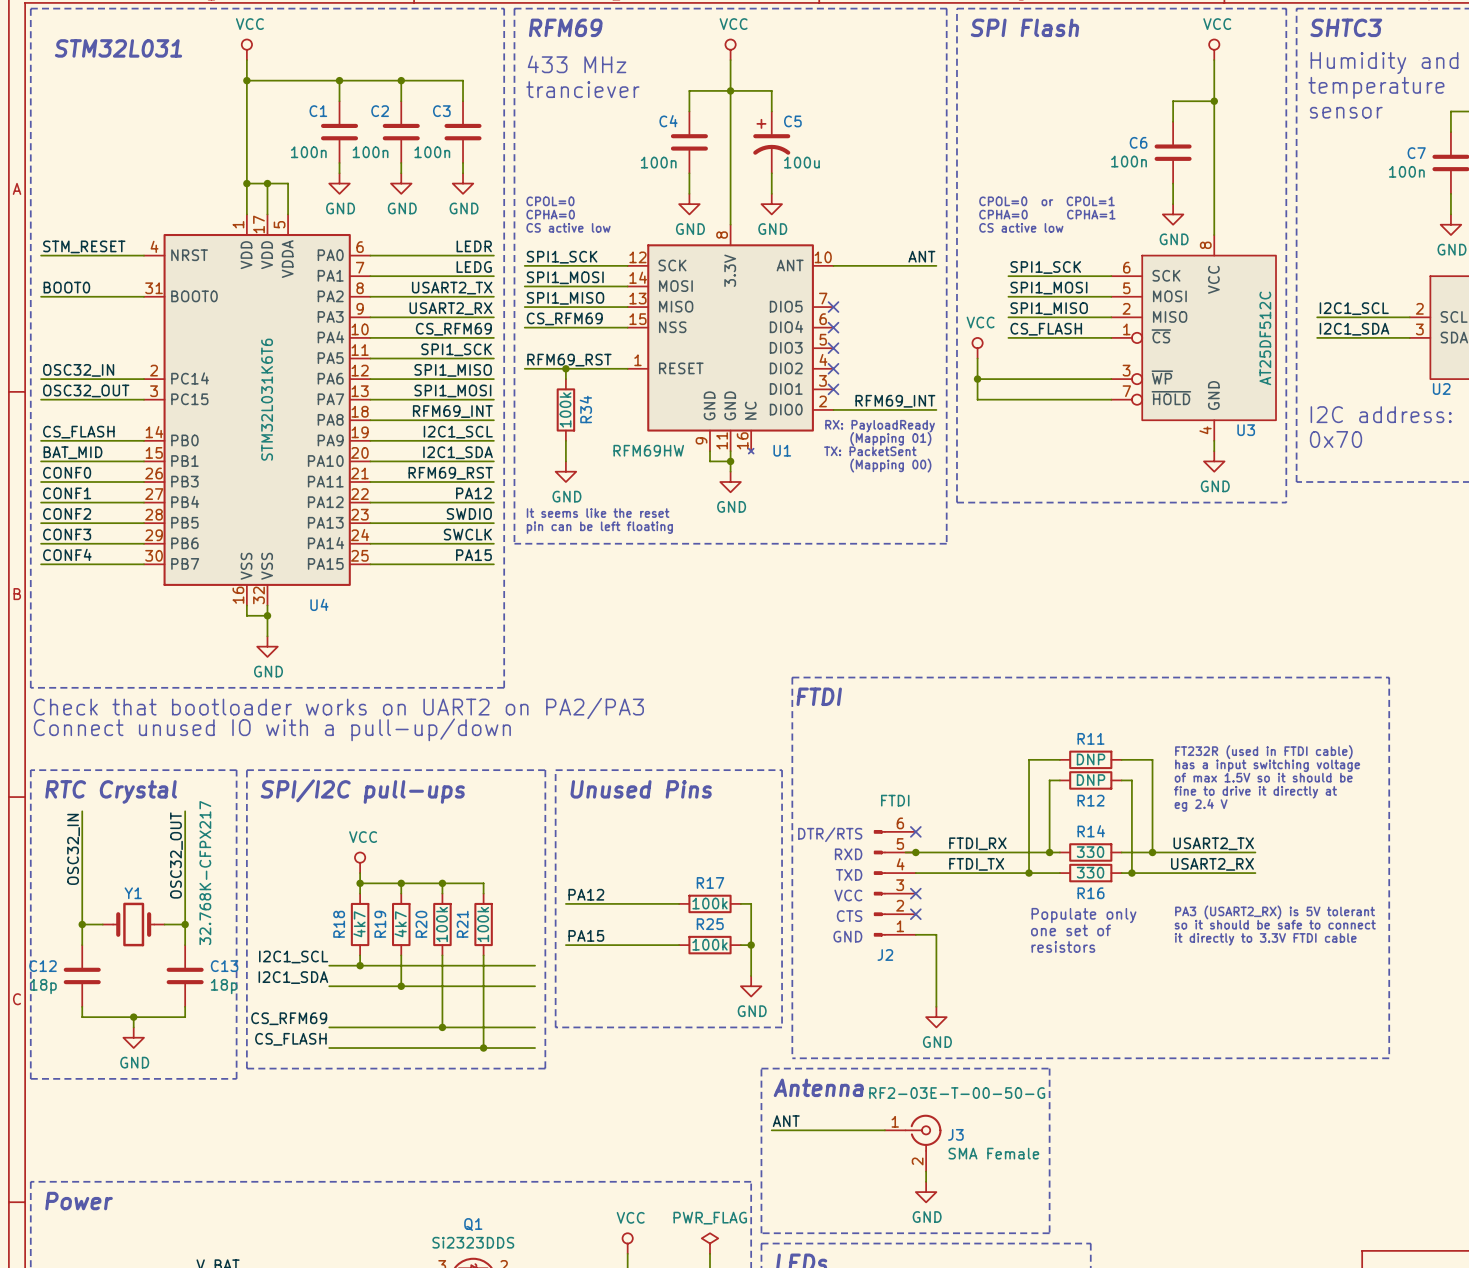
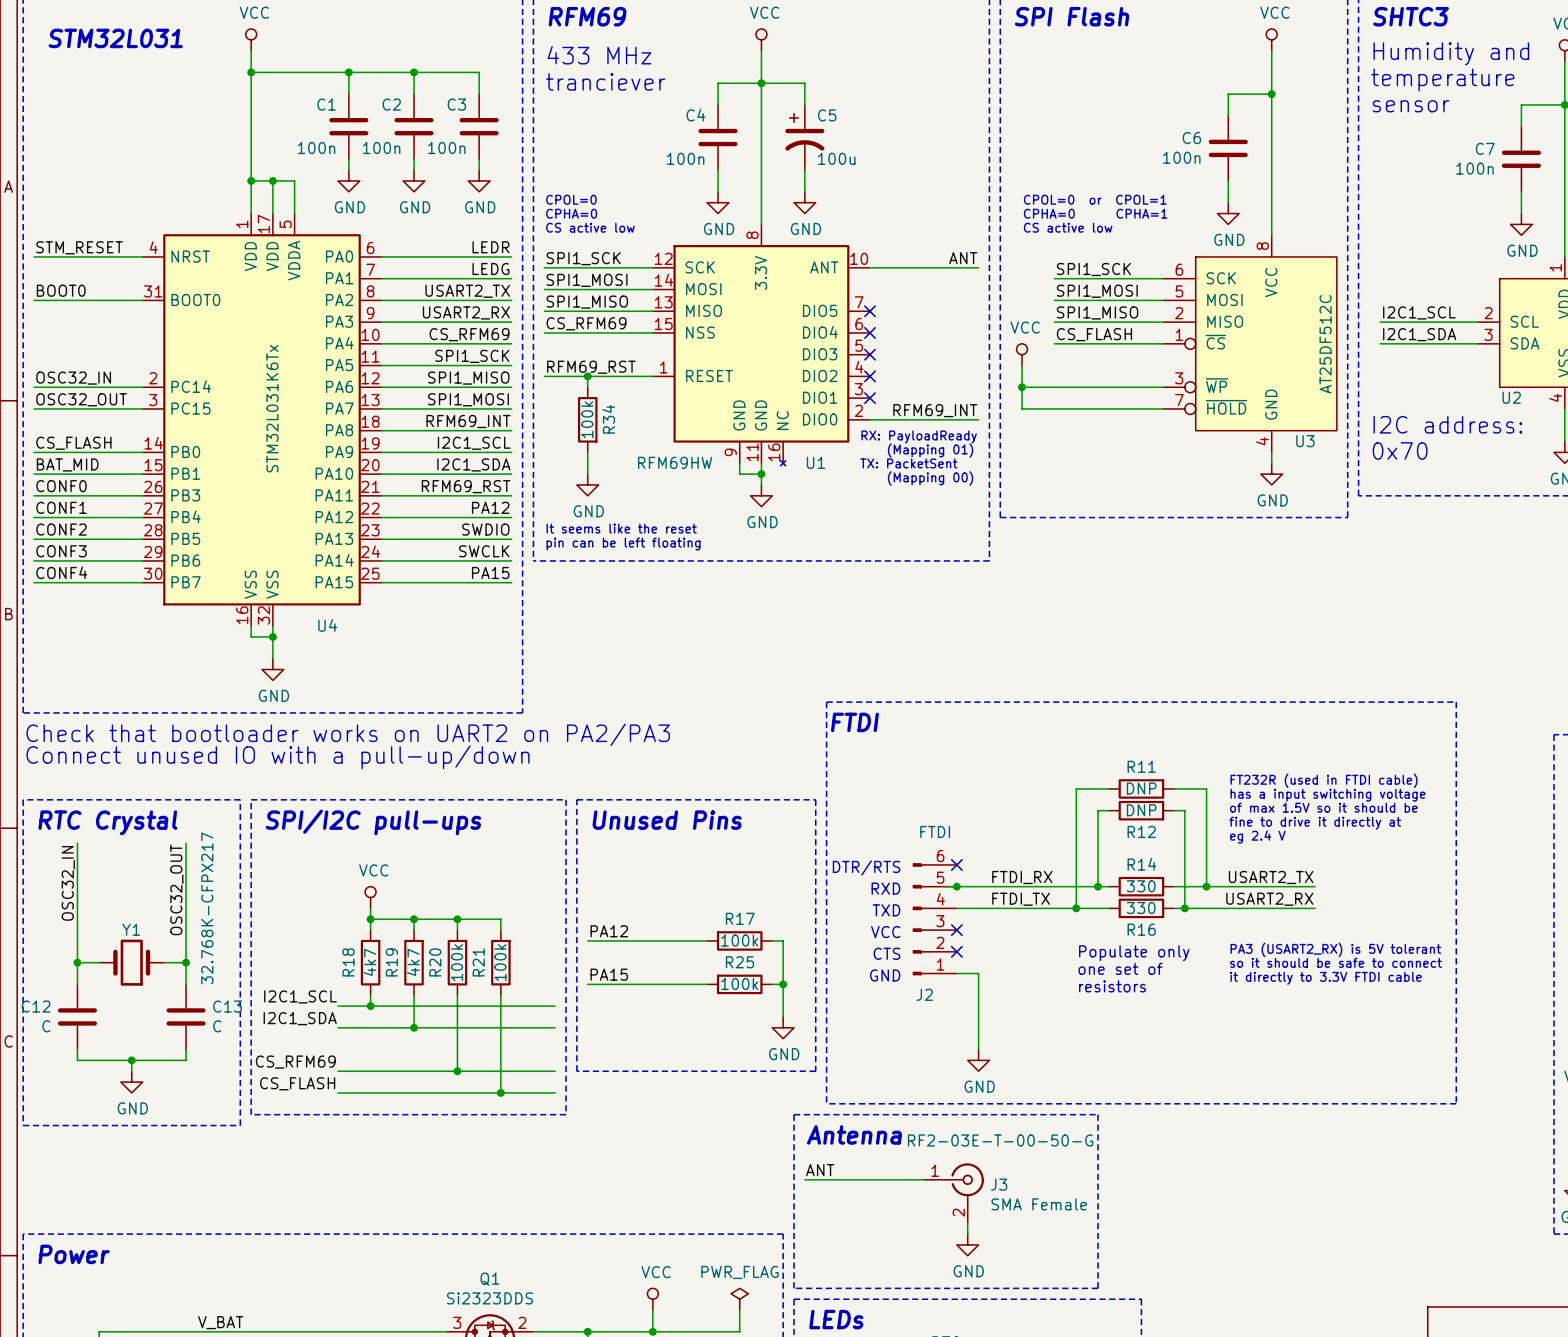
U4 value: STM32L031K6T6 (267, 399) -> STM32L031K6Tx (272, 408)
C12 value: 18p (43, 986) -> C (46, 1026)
C13 value: 18p (224, 986) -> C (217, 1026)

